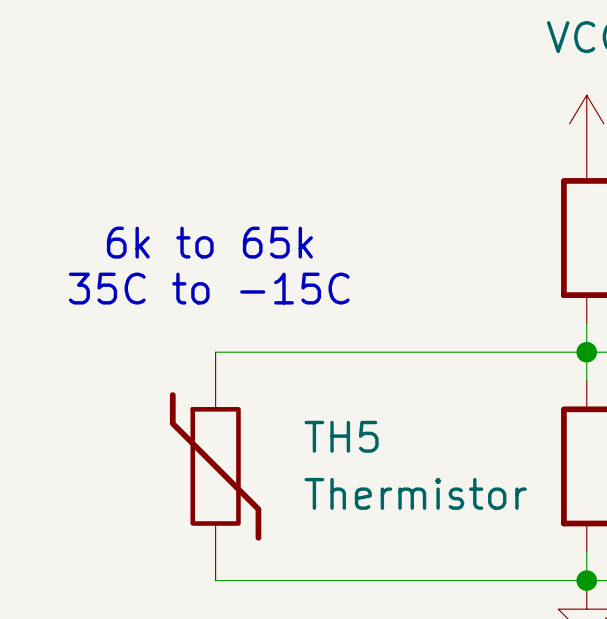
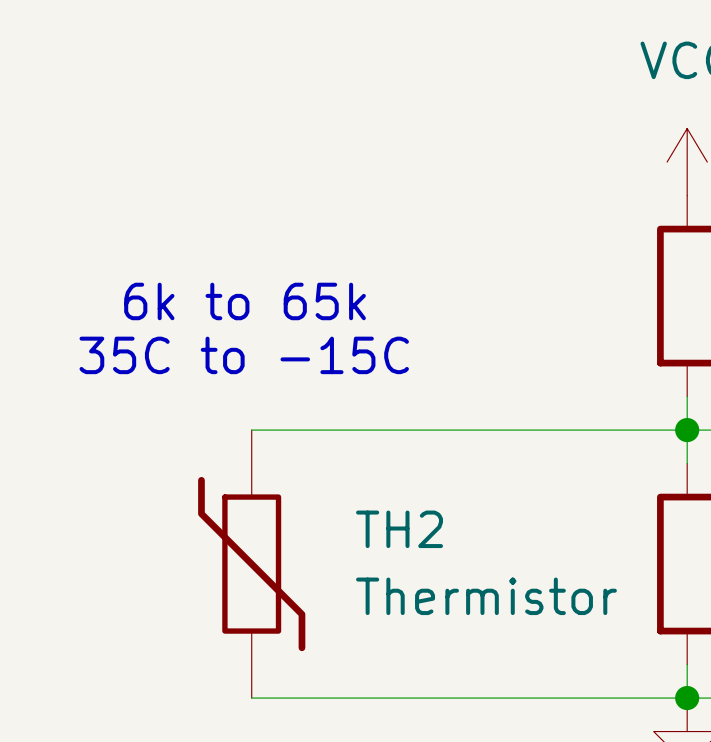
TH5 name: TH5 (341, 436) -> TH2 (399, 529)

